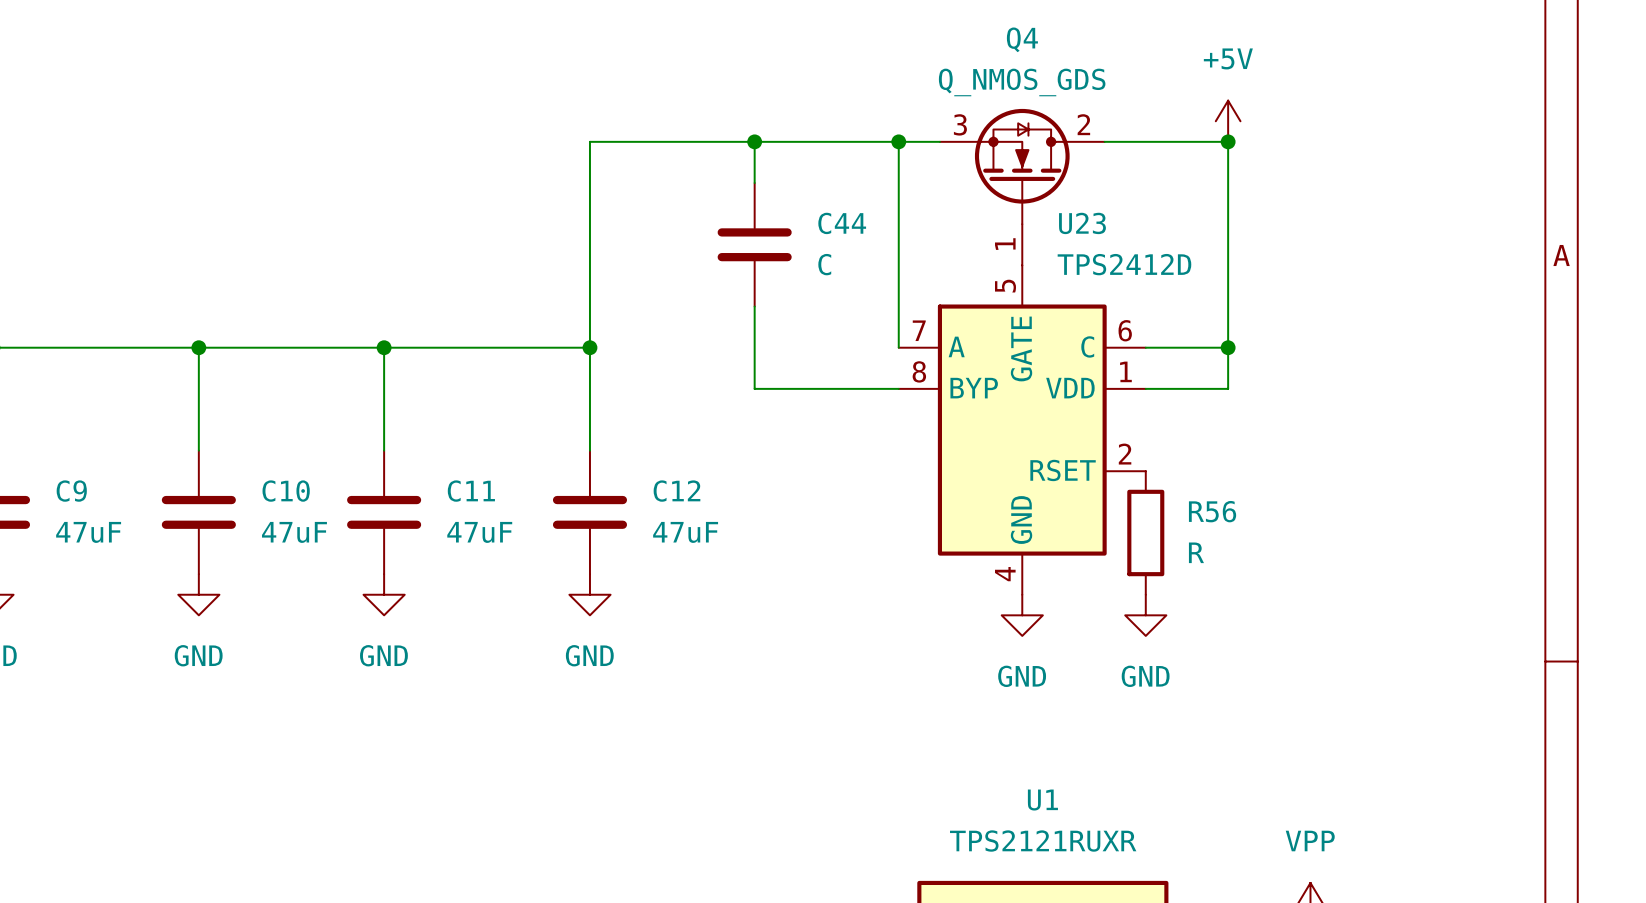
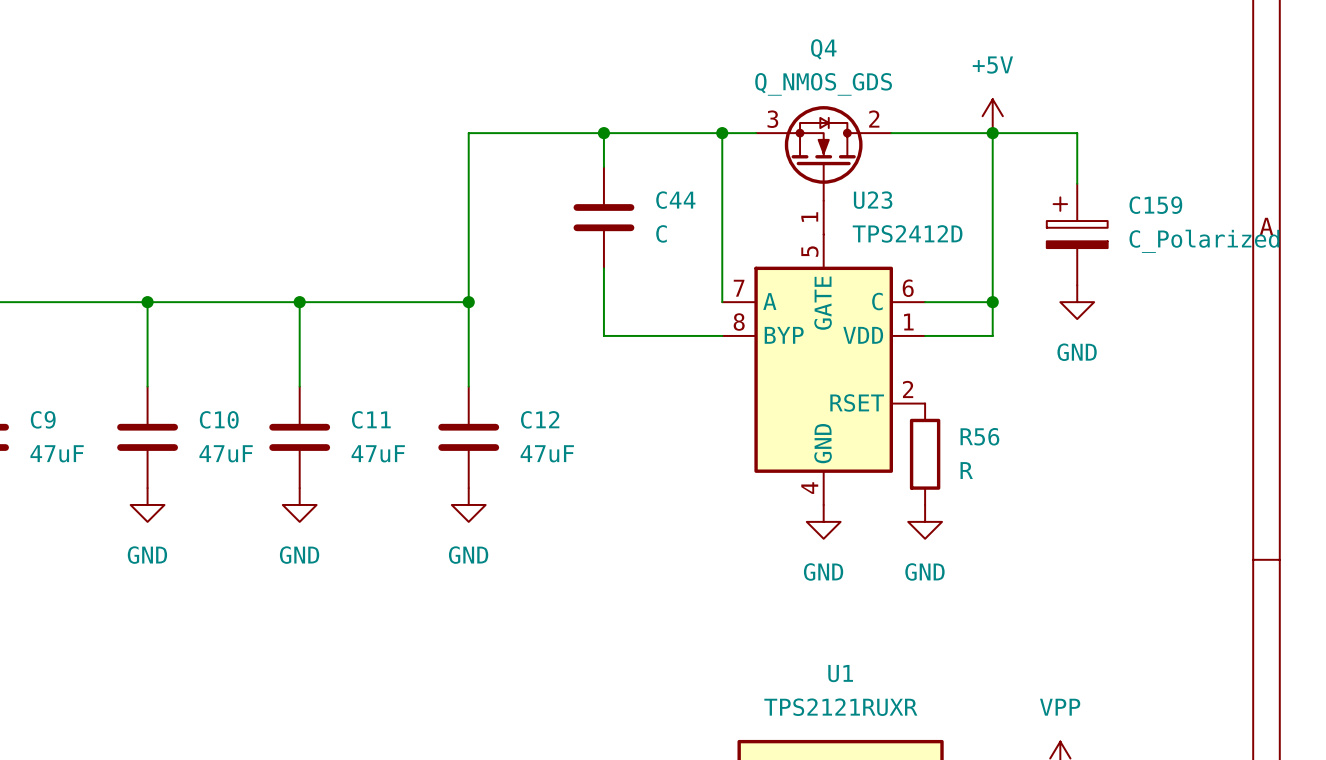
wire: none -> (992, 133) (1077, 133) (1077, 183)
C159: none -> C_Polarized (1077, 234)
power symbol: none -> GND (1077, 302)

